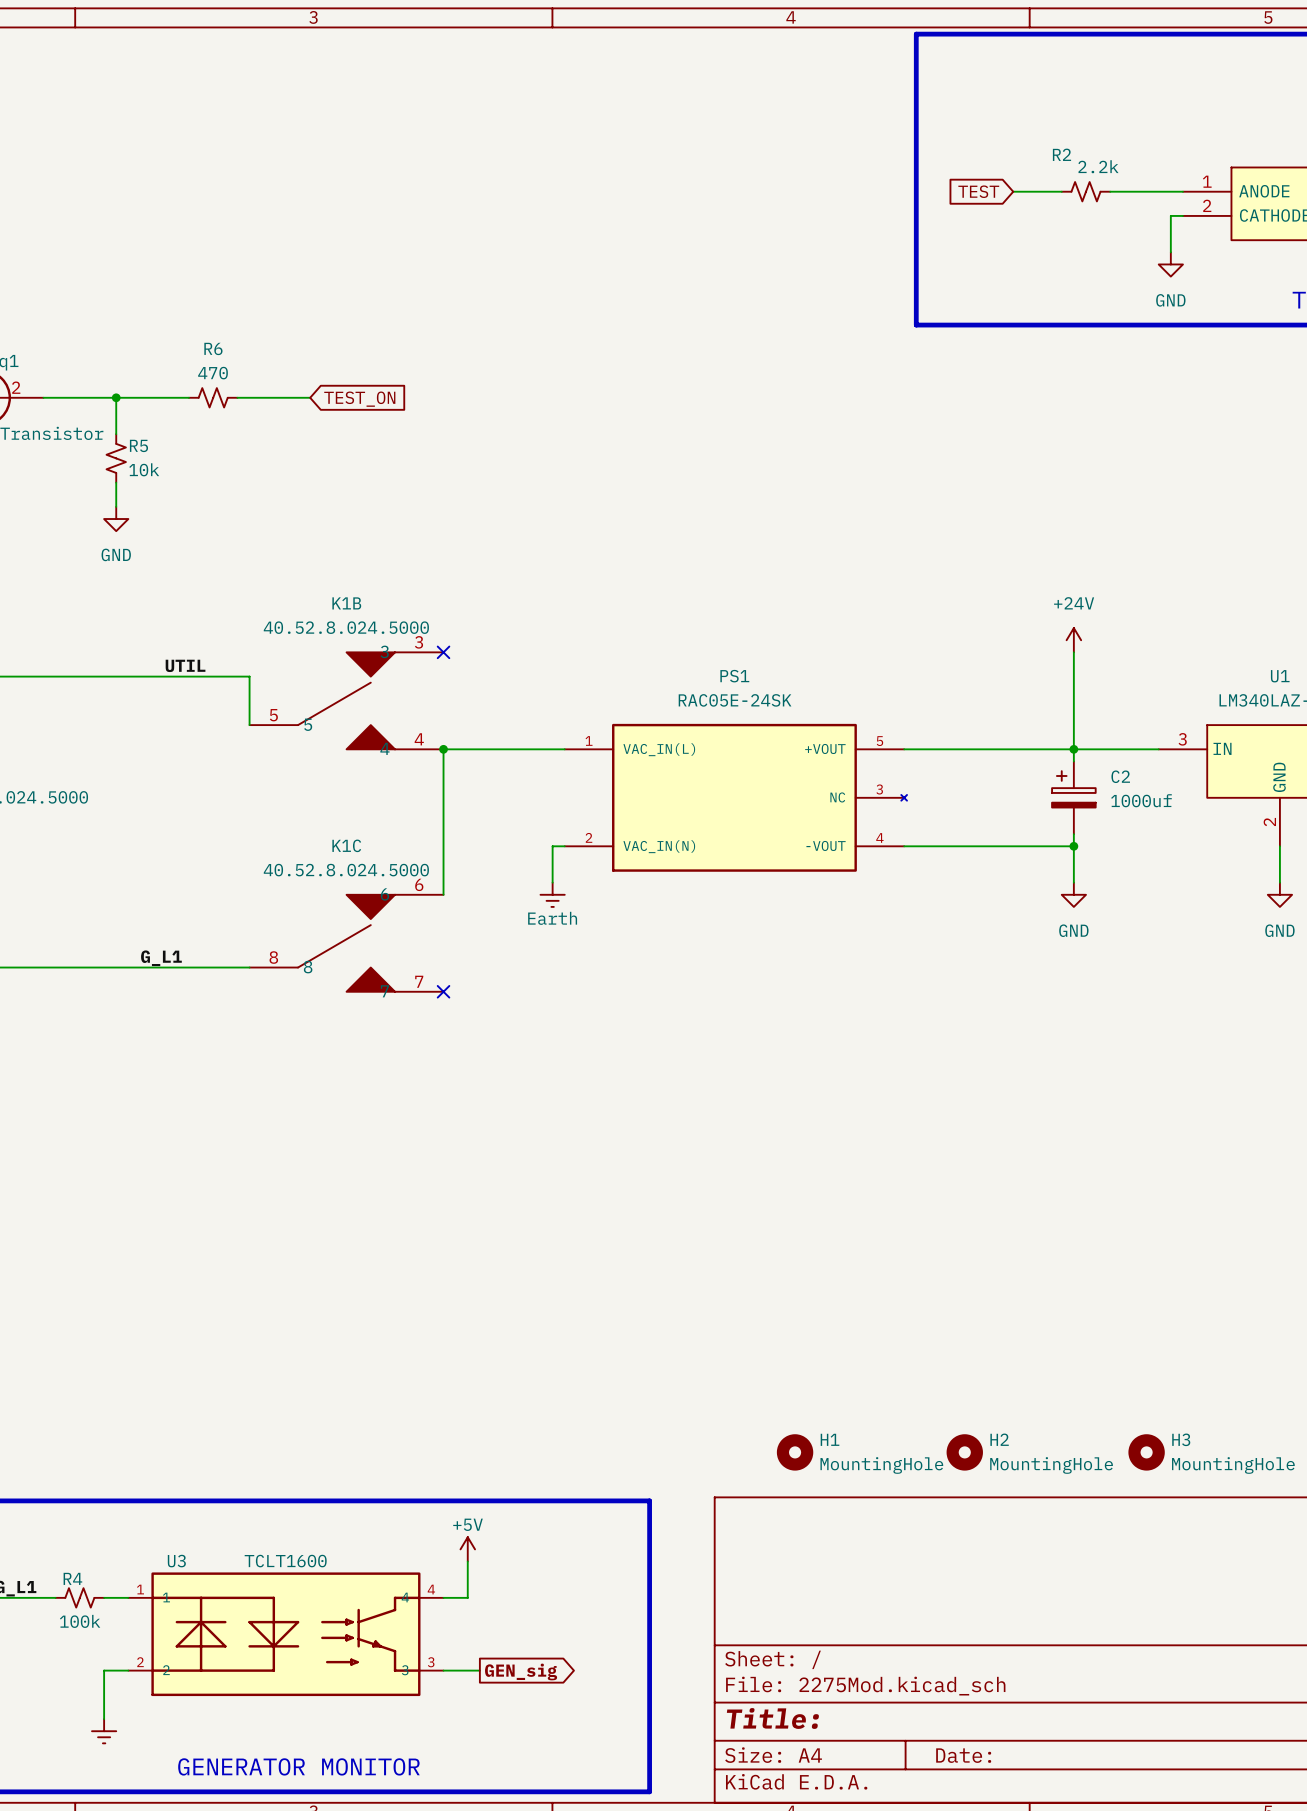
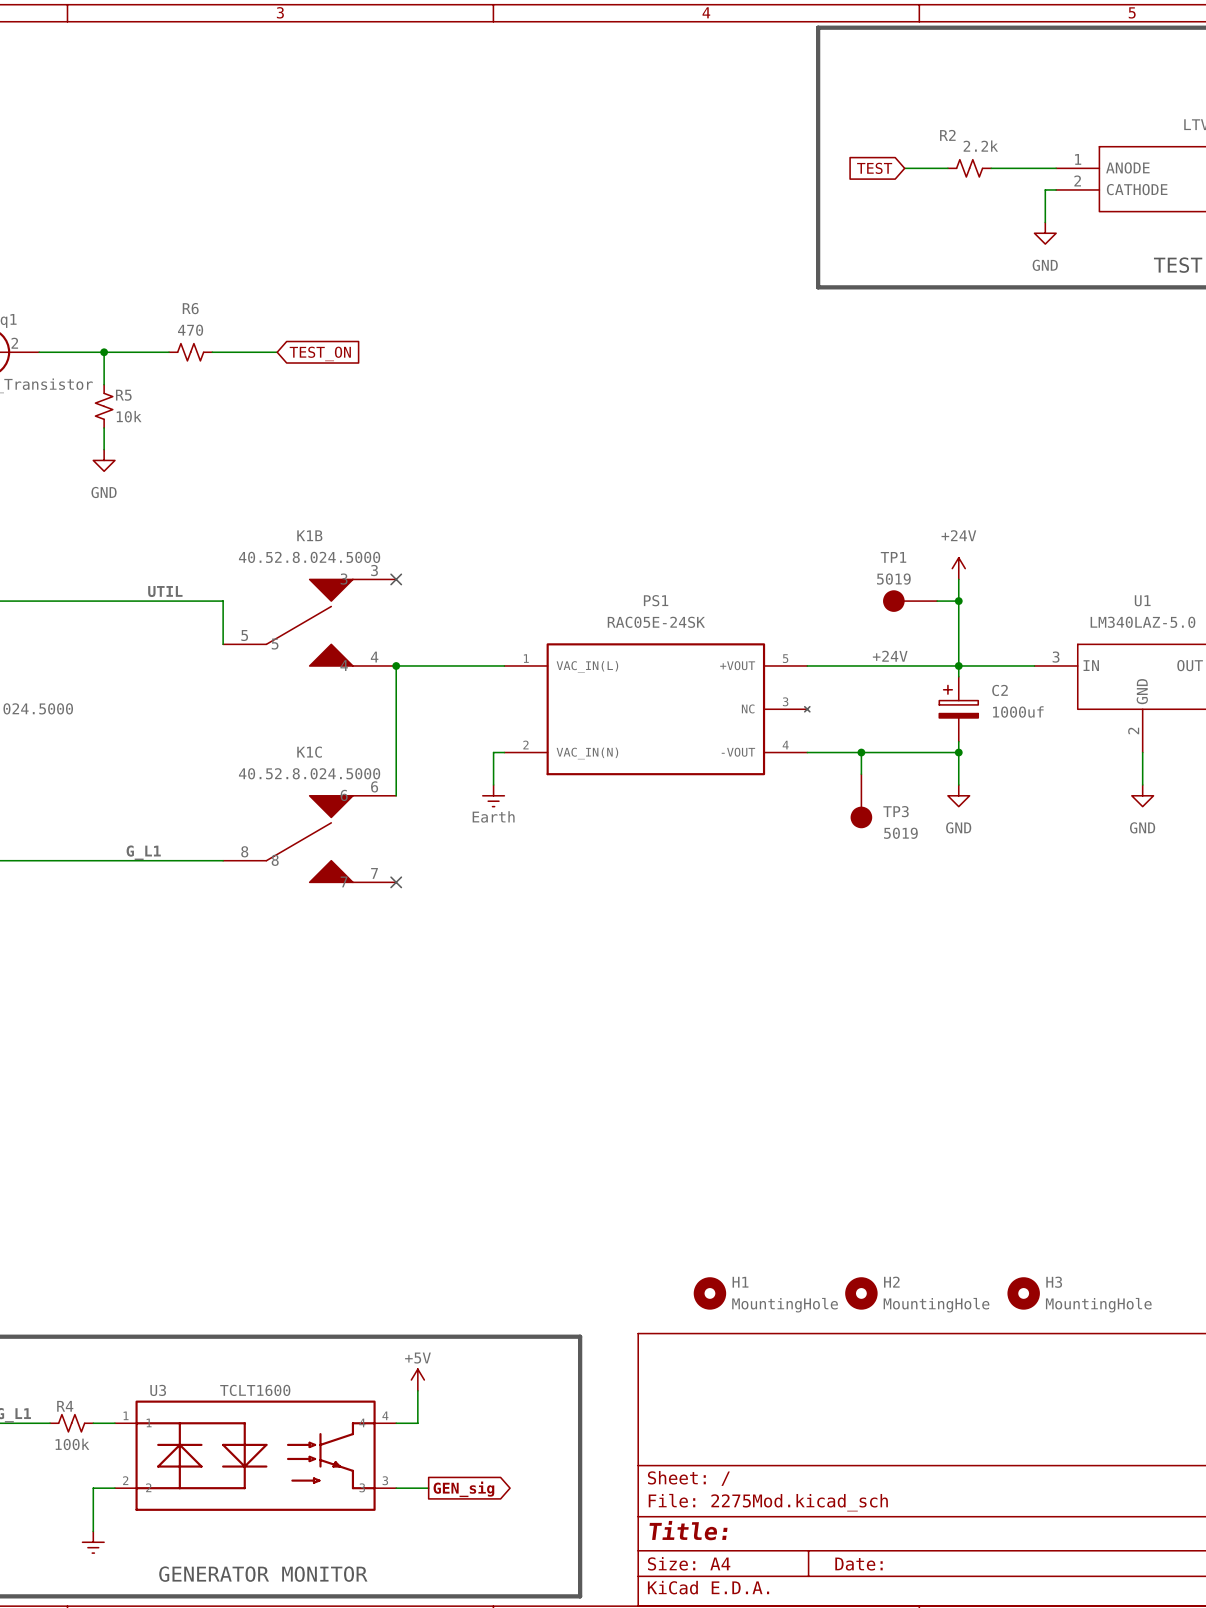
TP1: none -> 5019 (910, 601)
wire: none -> (937, 601) (958, 601)
junction: none -> (958, 601)
label: none -> +24V (890, 656)
wire: none -> (861, 752) (861, 774)
junction: none -> (861, 752)
TP3: none -> 5019 (861, 801)

